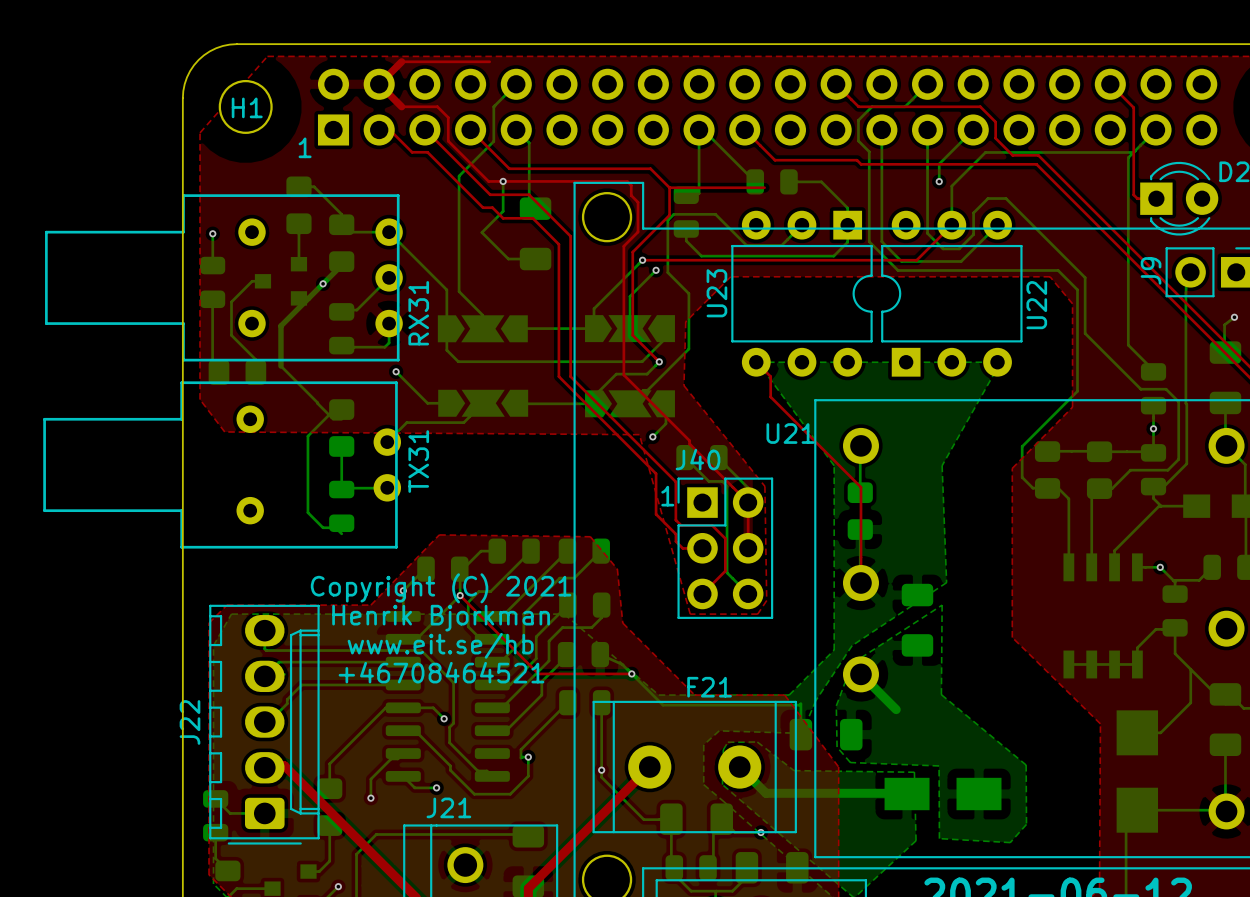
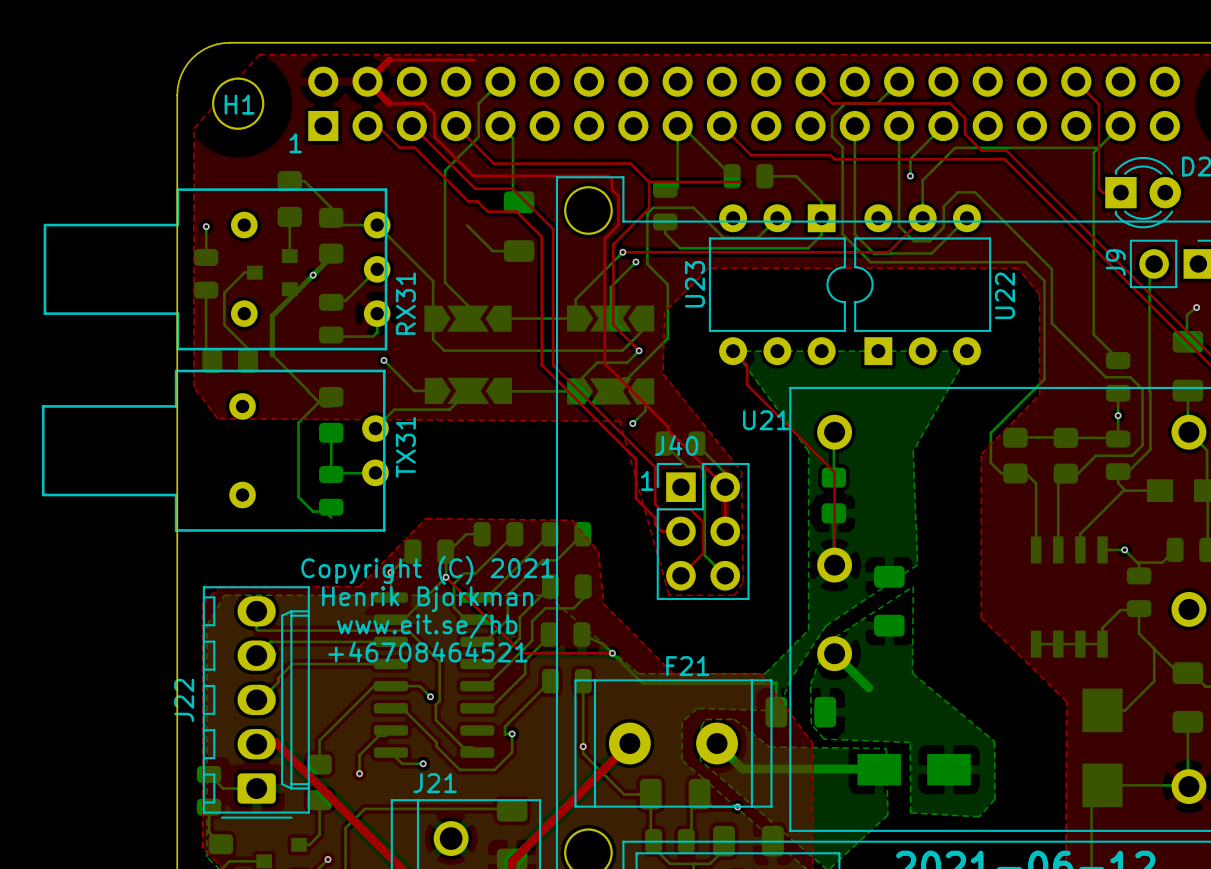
bottom track: (503, 181) (503, 211) (481, 232) -> none
via: (503, 181) -> none

